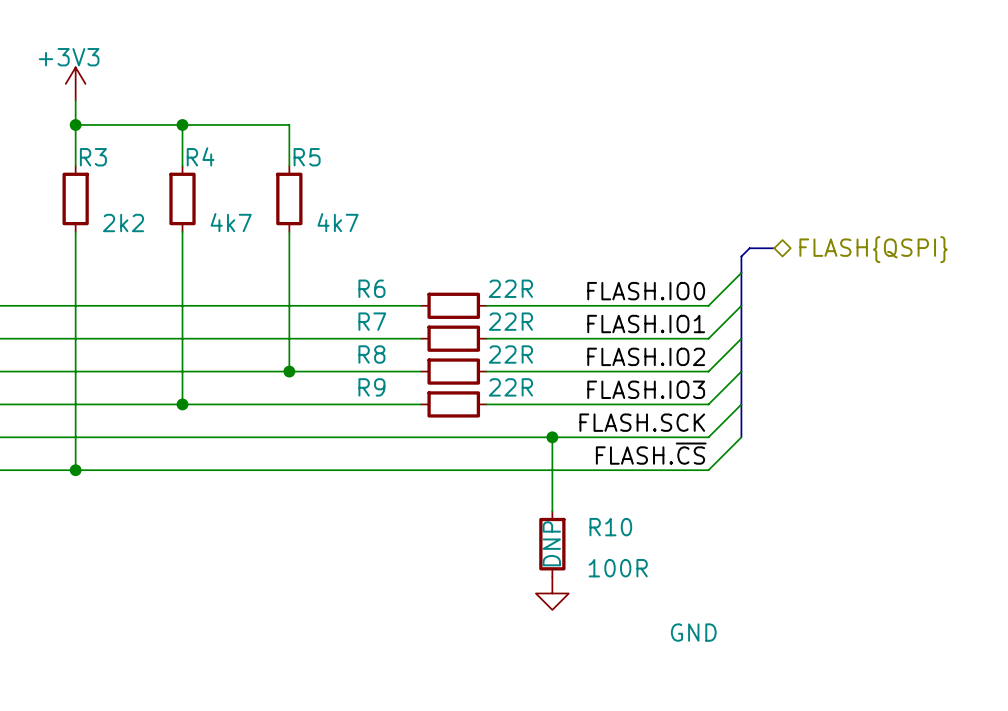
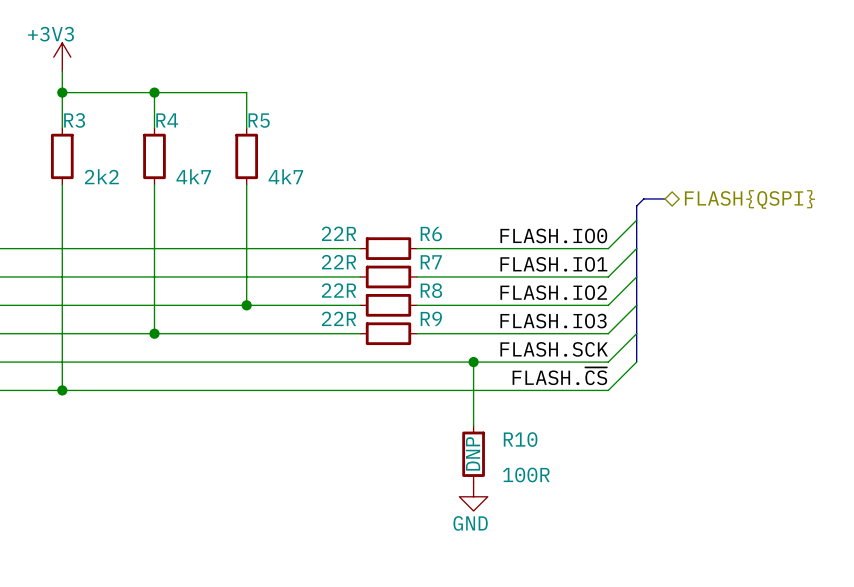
R6 name position: R6 (371, 288) -> R6 (431, 234)
R6 text position: 22R (510, 288) -> 22R (339, 233)
R7 name position: R7 (372, 321) -> R7 (431, 262)
R7 text position: 22R (510, 321) -> 22R (339, 262)
R8 name position: R8 (371, 354) -> R8 (431, 290)
R8 text position: 22R (510, 354) -> 22R (339, 290)
R9 name position: R9 (371, 387) -> R9 (431, 318)
R9 text position: 22R (510, 387) -> 22R (339, 318)
power symbol text position: GND (693, 632) -> GND (470, 523)

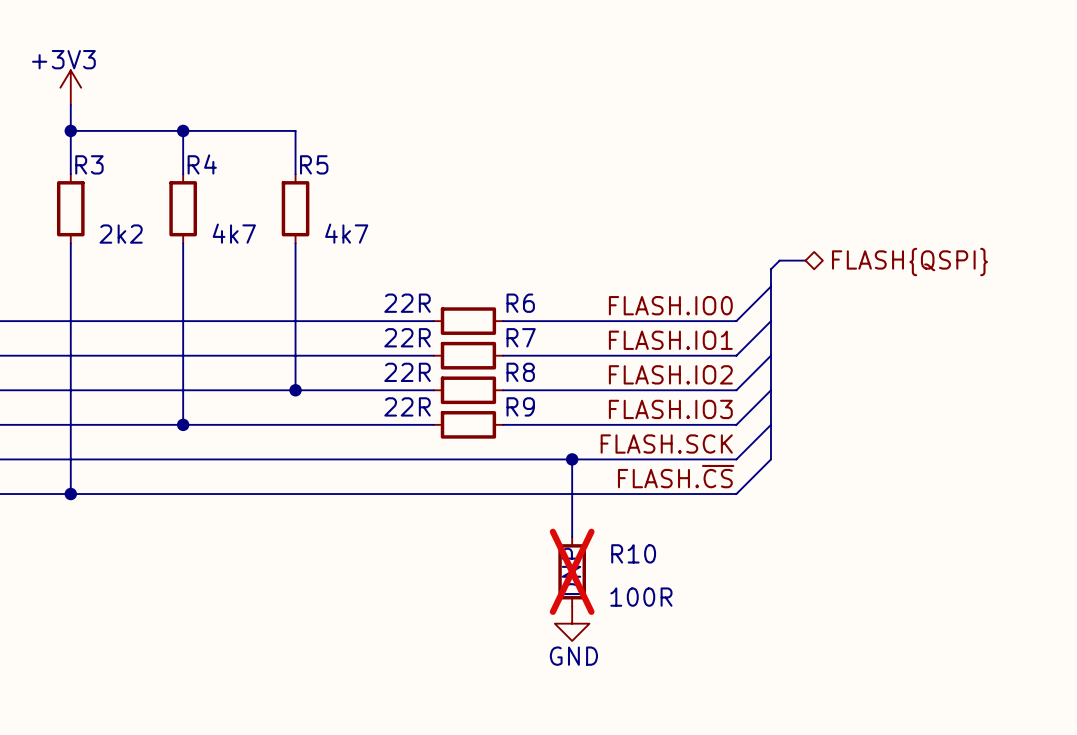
R10 do-not-place cross: none -> (572, 571)

